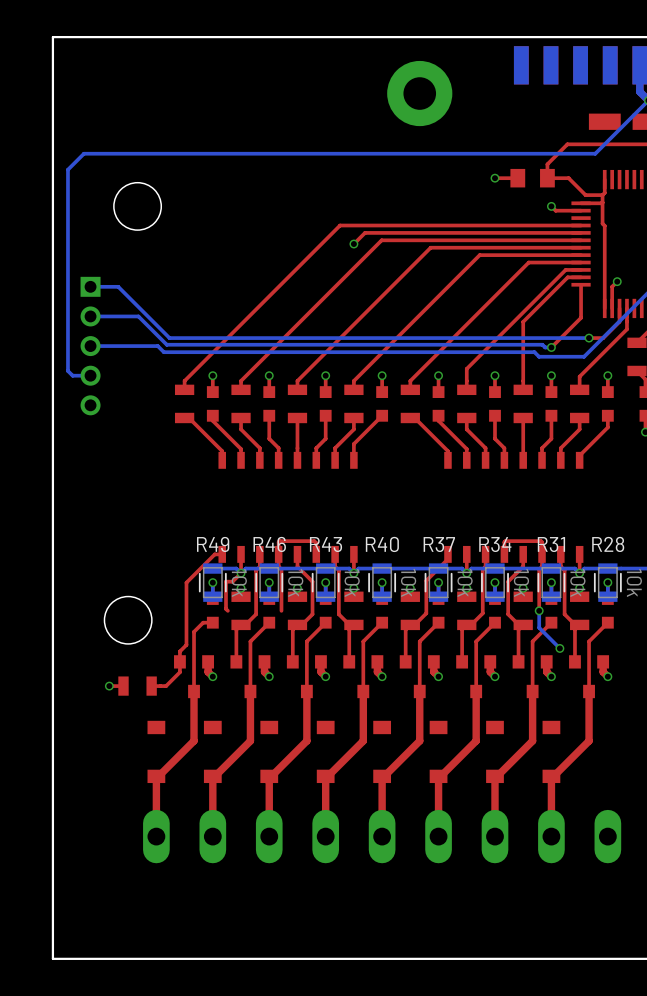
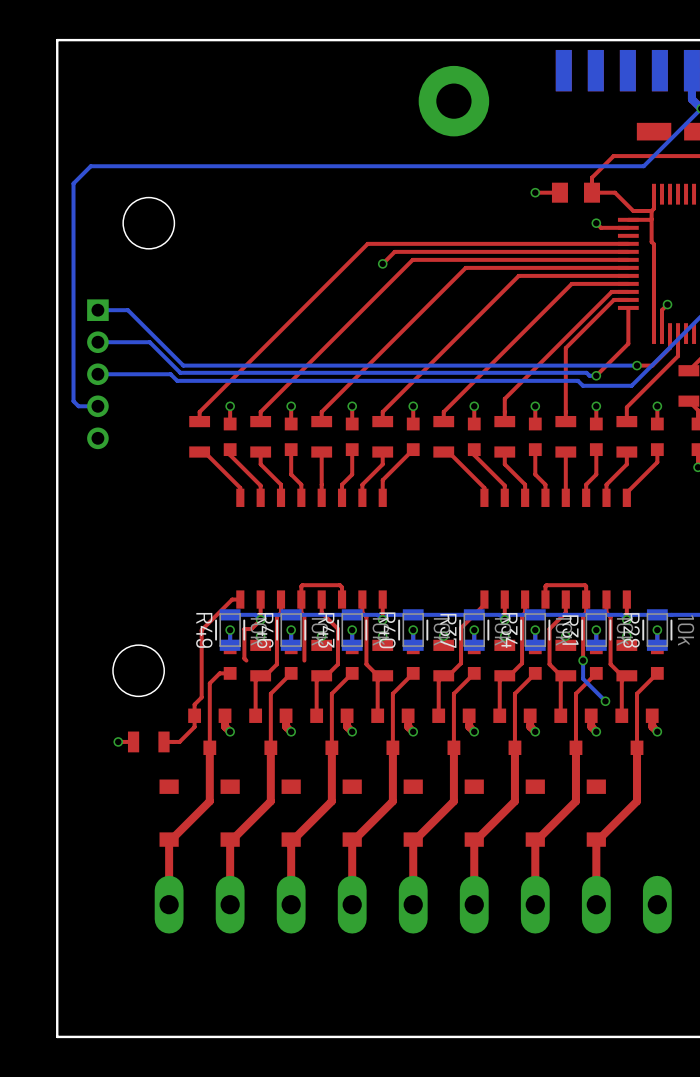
R49 name rotation: 0° (213, 544) -> 90° clockwise (204, 630)
R46 name rotation: 0° (269, 544) -> 90° clockwise (265, 630)
R43 name rotation: 0° (326, 544) -> 90° clockwise (326, 630)
R40 name rotation: 0° (382, 544) -> 90° clockwise (387, 630)
R37 name rotation: 0° (439, 544) -> 90° clockwise (448, 630)
R34 name rotation: 0° (495, 544) -> 90° clockwise (509, 630)
R31 name rotation: 0° (551, 544) -> 90° clockwise (570, 630)
R28 name rotation: 0° (608, 544) -> 90° clockwise (631, 630)

